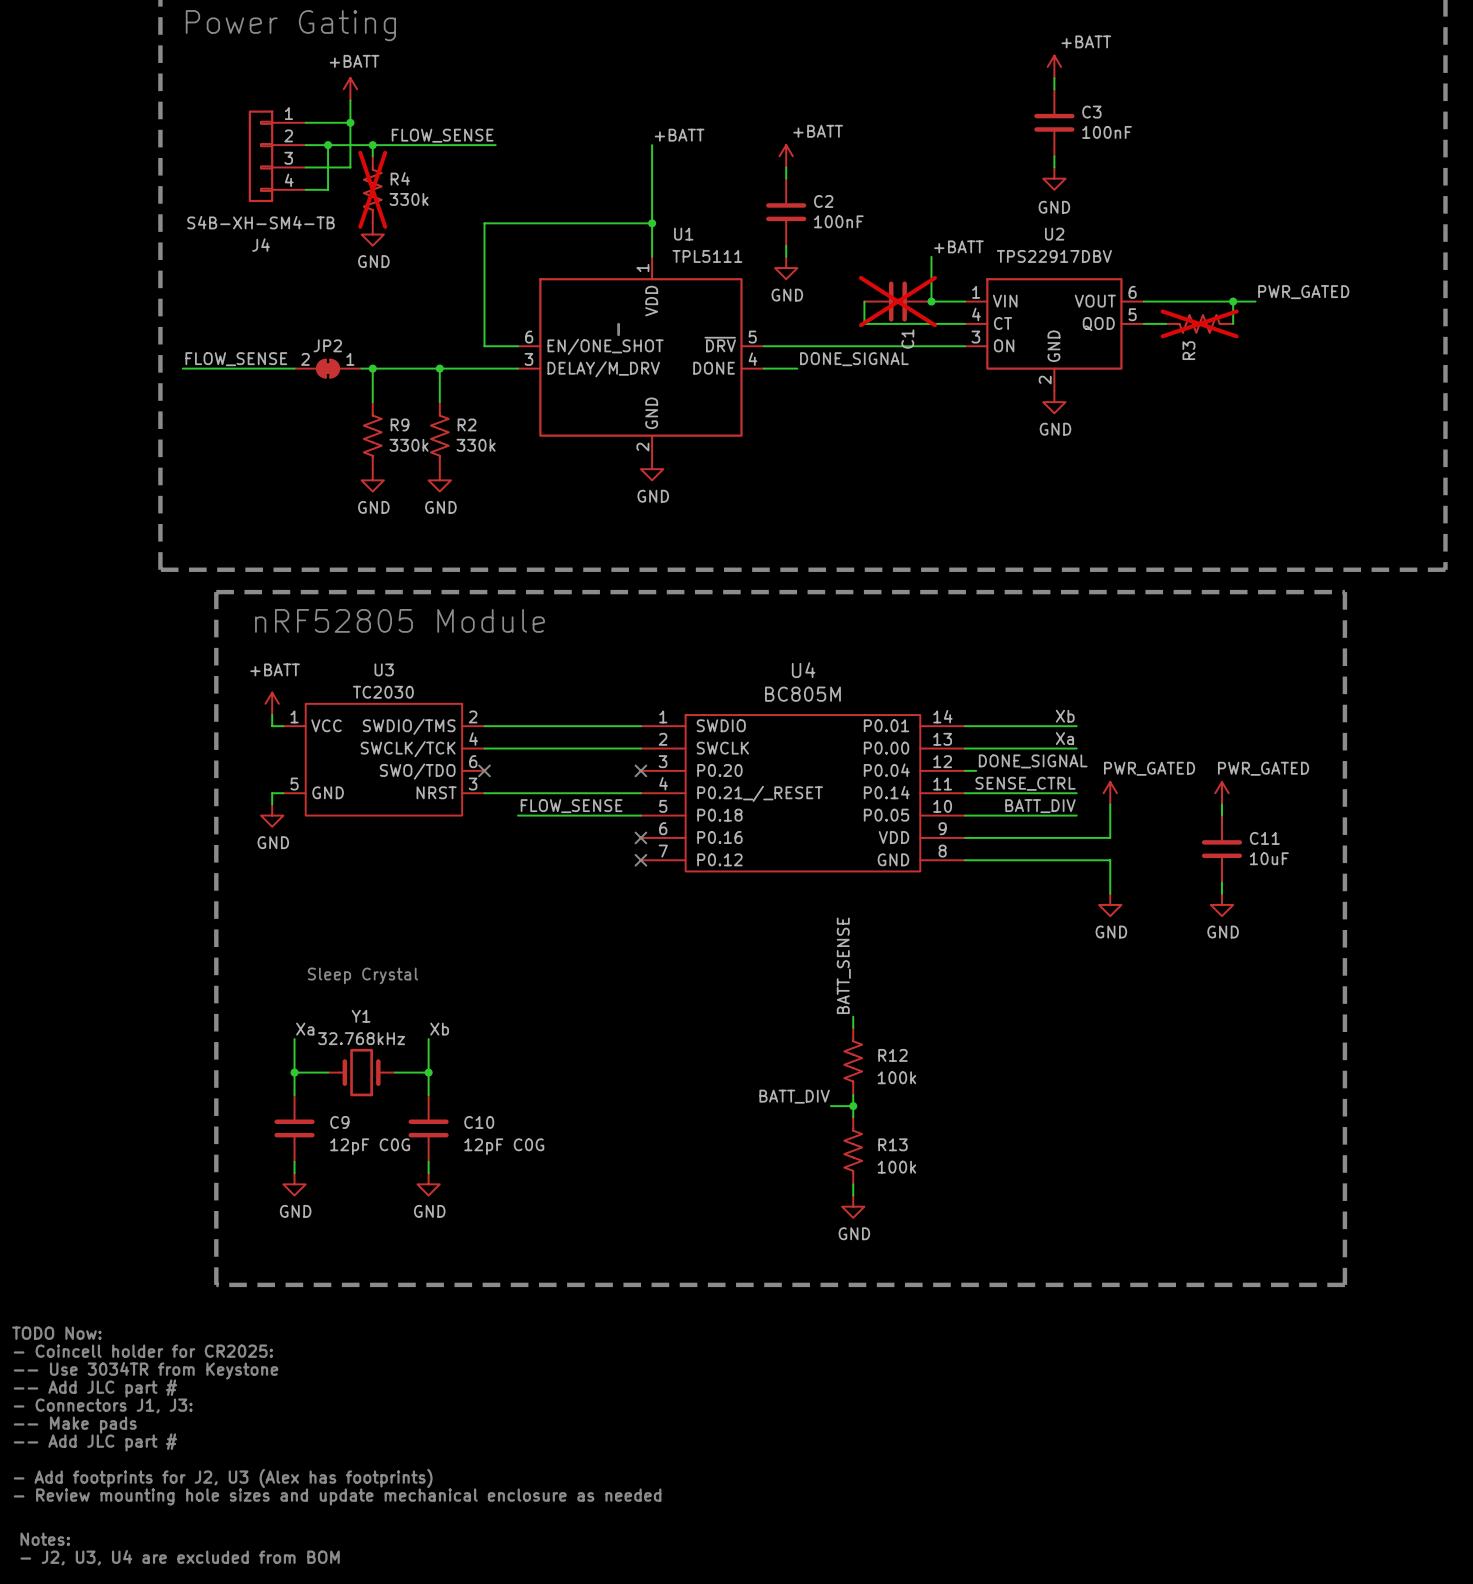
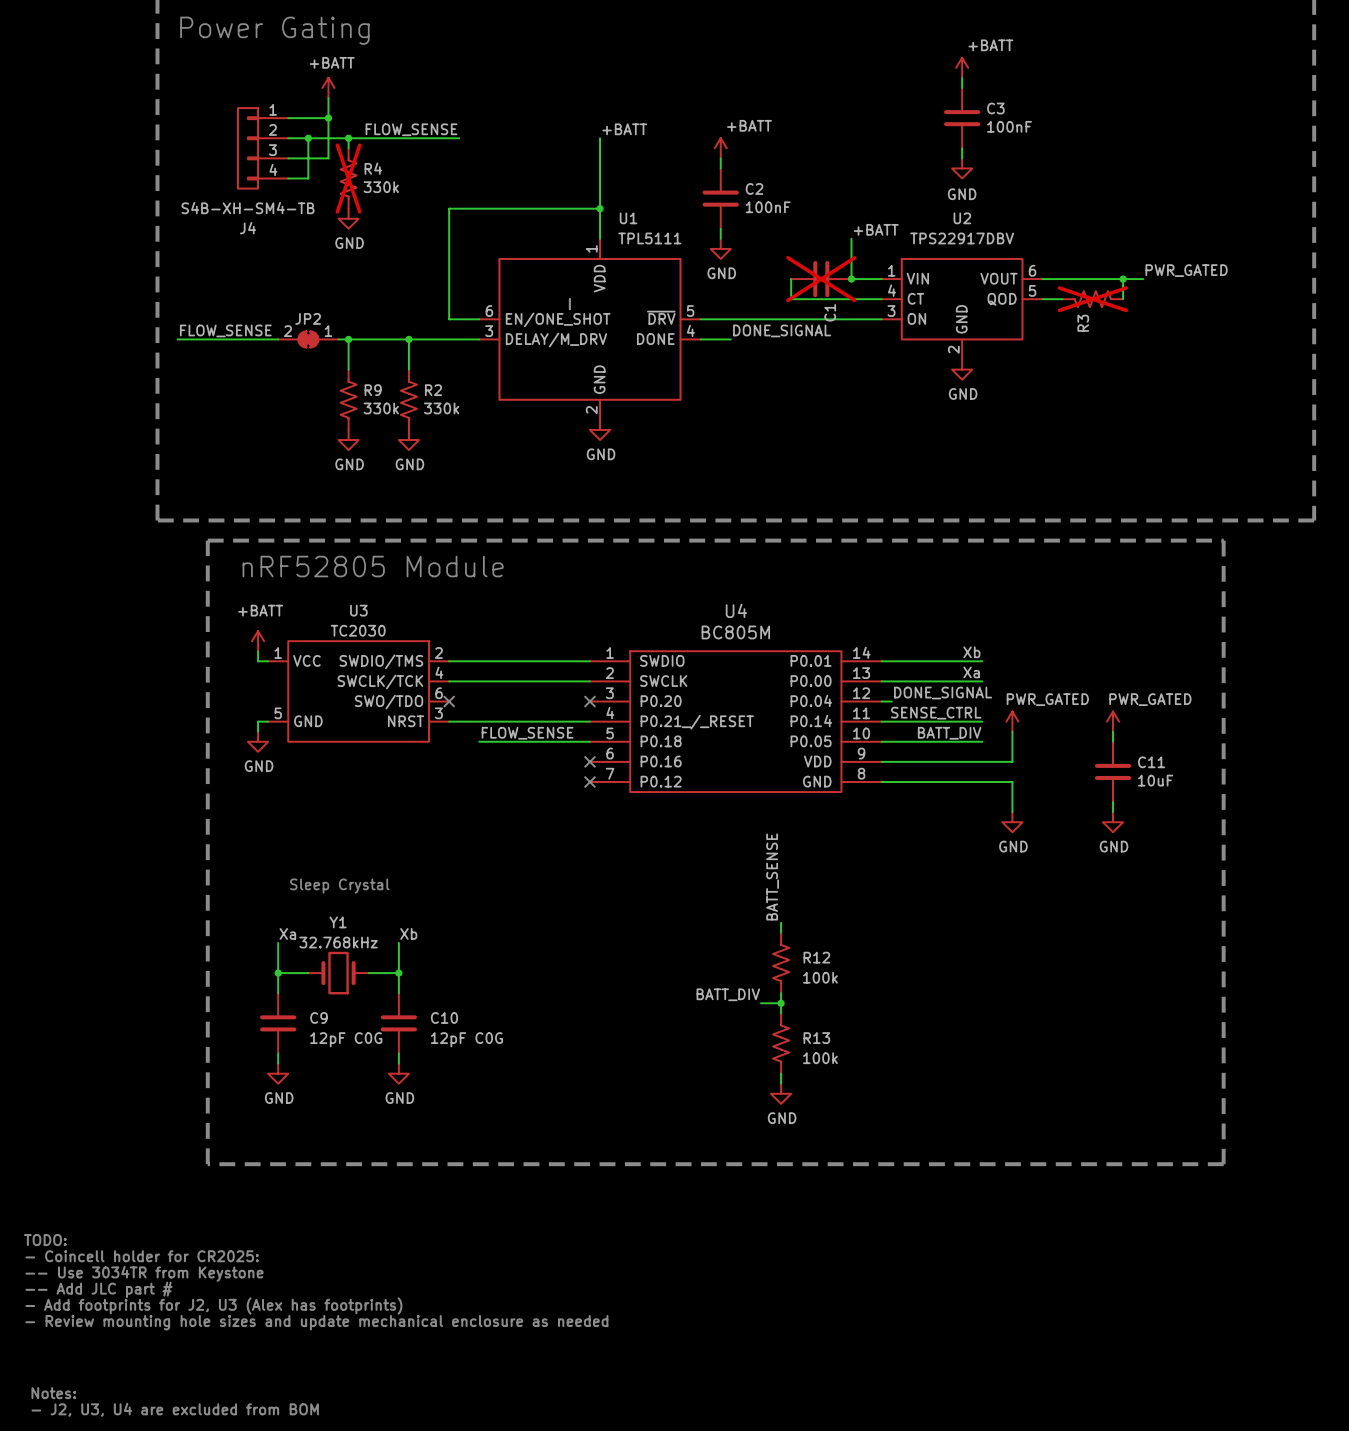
text: TODO Now: (56, 1333) -> none
text: - Coincell holder for CR2025: (143, 1351) -> none
text: -- Use 3034TR from Keystone (146, 1370) -> TODO: (45, 1240)
text: -- Add JLC part # (95, 1388) -> - Coincell holder for CR2025: (142, 1256)
text: - Connectors J1, J3: (103, 1405) -> -- Use 3034TR from Keystone (144, 1273)
text: -- Make pads (75, 1424) -> -- Add JLC part # (98, 1289)
text: -- Add JLC part # (95, 1442) -> - Add footprints for J2, U3 (Alex has footprints) (213, 1306)
text: - Add footprints for J2, U3 (Alex has footprints) (223, 1478) -> none
text position: - Review mounting hole sizes and update mechanical enclosure as needed (337, 1496) -> - Review mounting hole sizes and update mechanical enclosure as needed (316, 1322)

